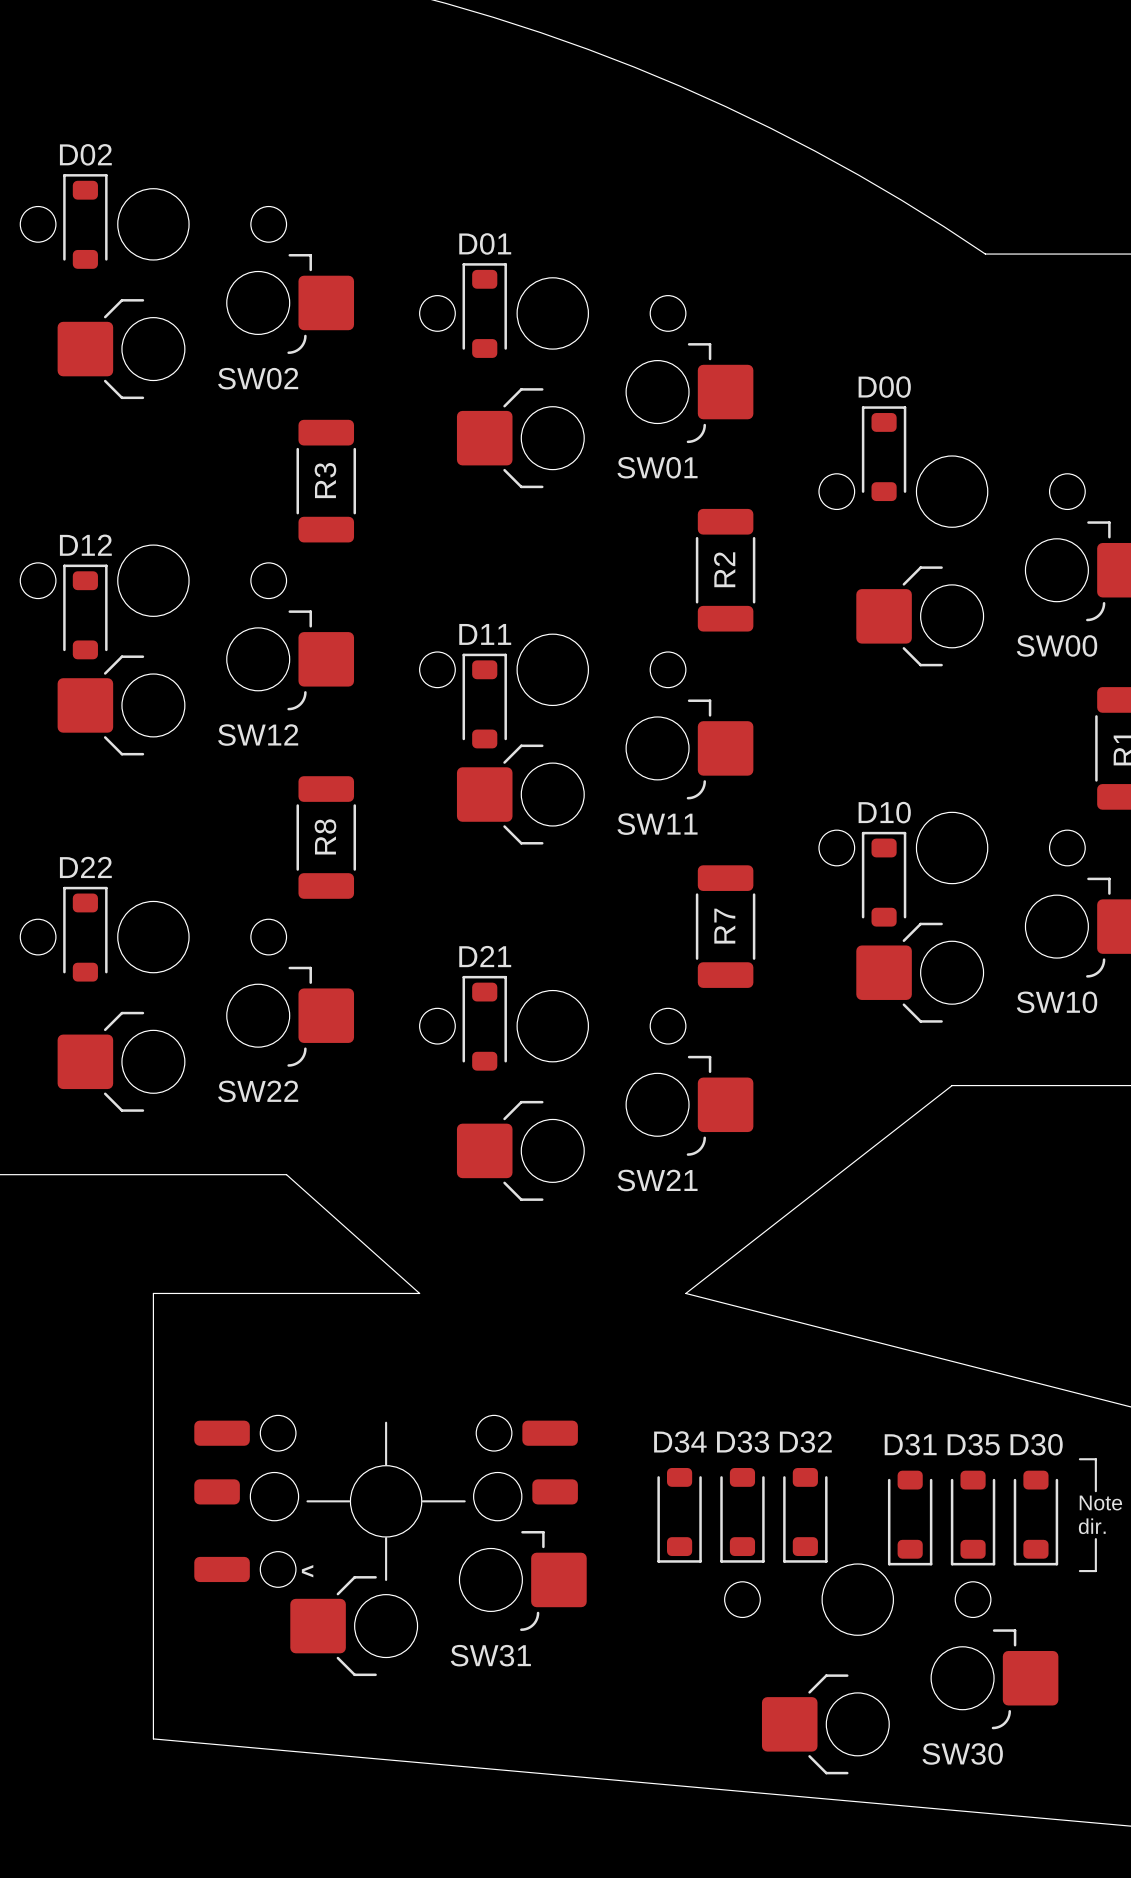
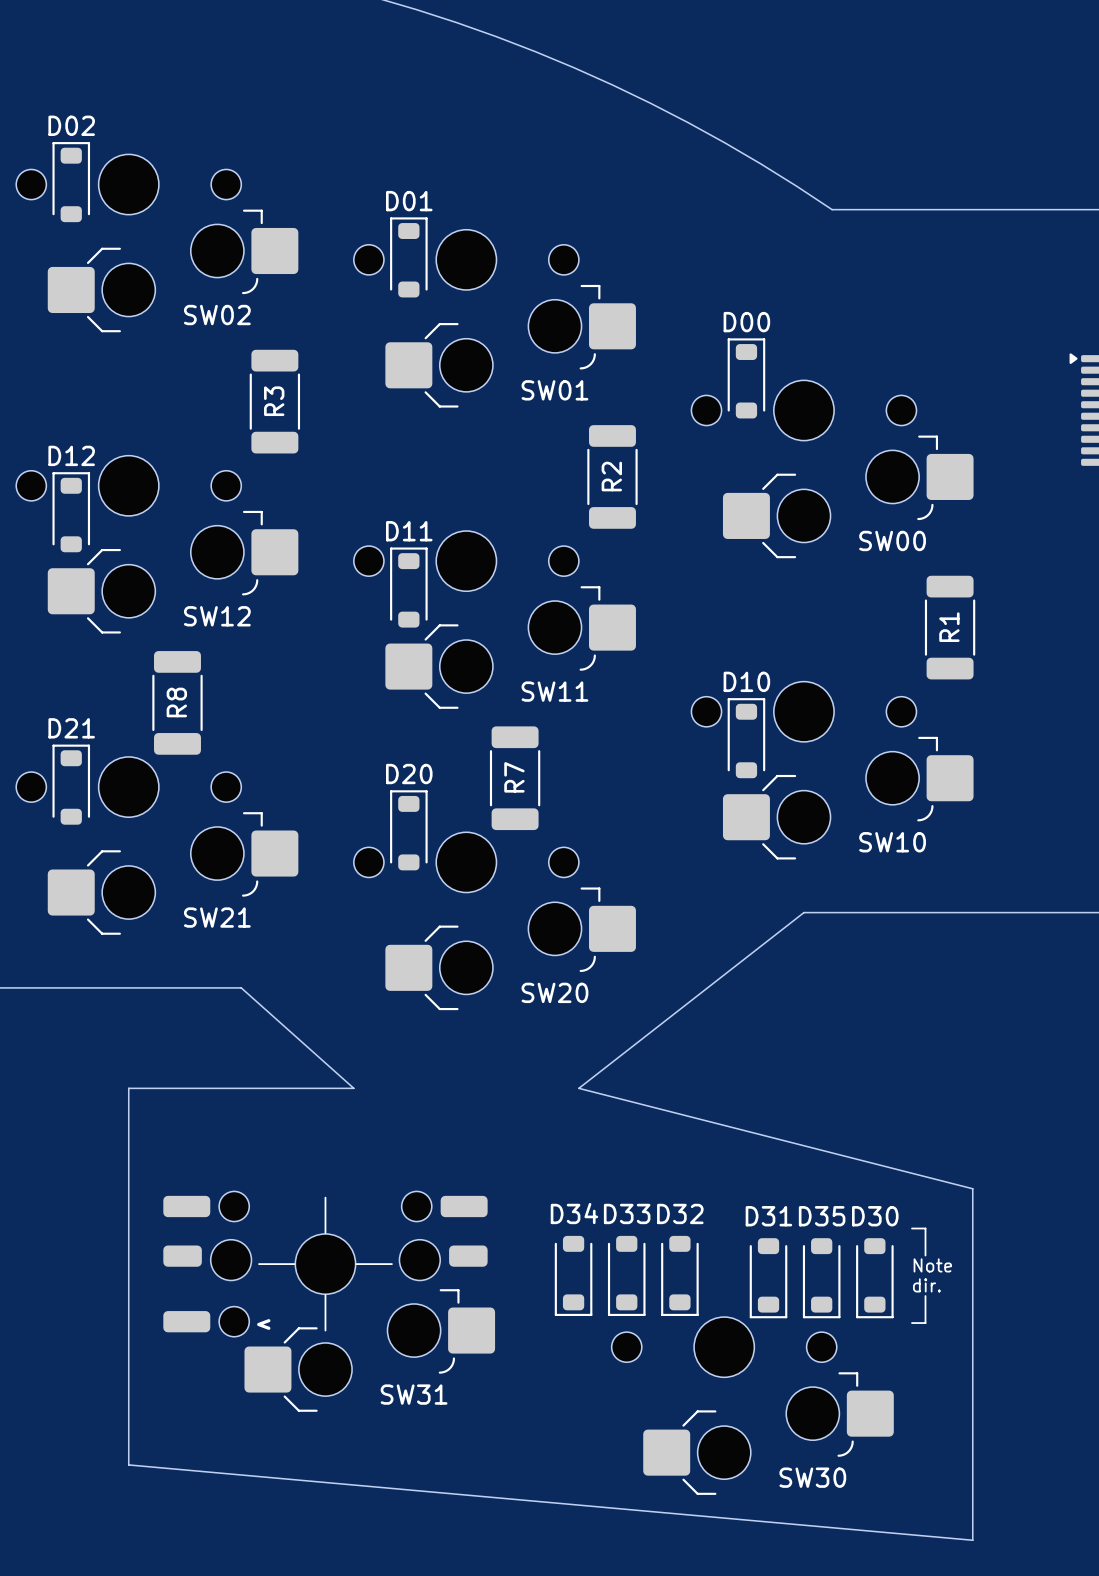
R8 position: (326, 837) -> (177, 702)
D22 name: D22 (85, 867) -> D21 (71, 728)
R7 position: (725, 926) -> (515, 778)
D20: none -> (408, 830)
D21: (484, 1023) -> none
SW22 name: SW22 (258, 1091) -> SW21 (217, 917)
SW21 name: SW21 (657, 1180) -> SW20 (554, 992)

